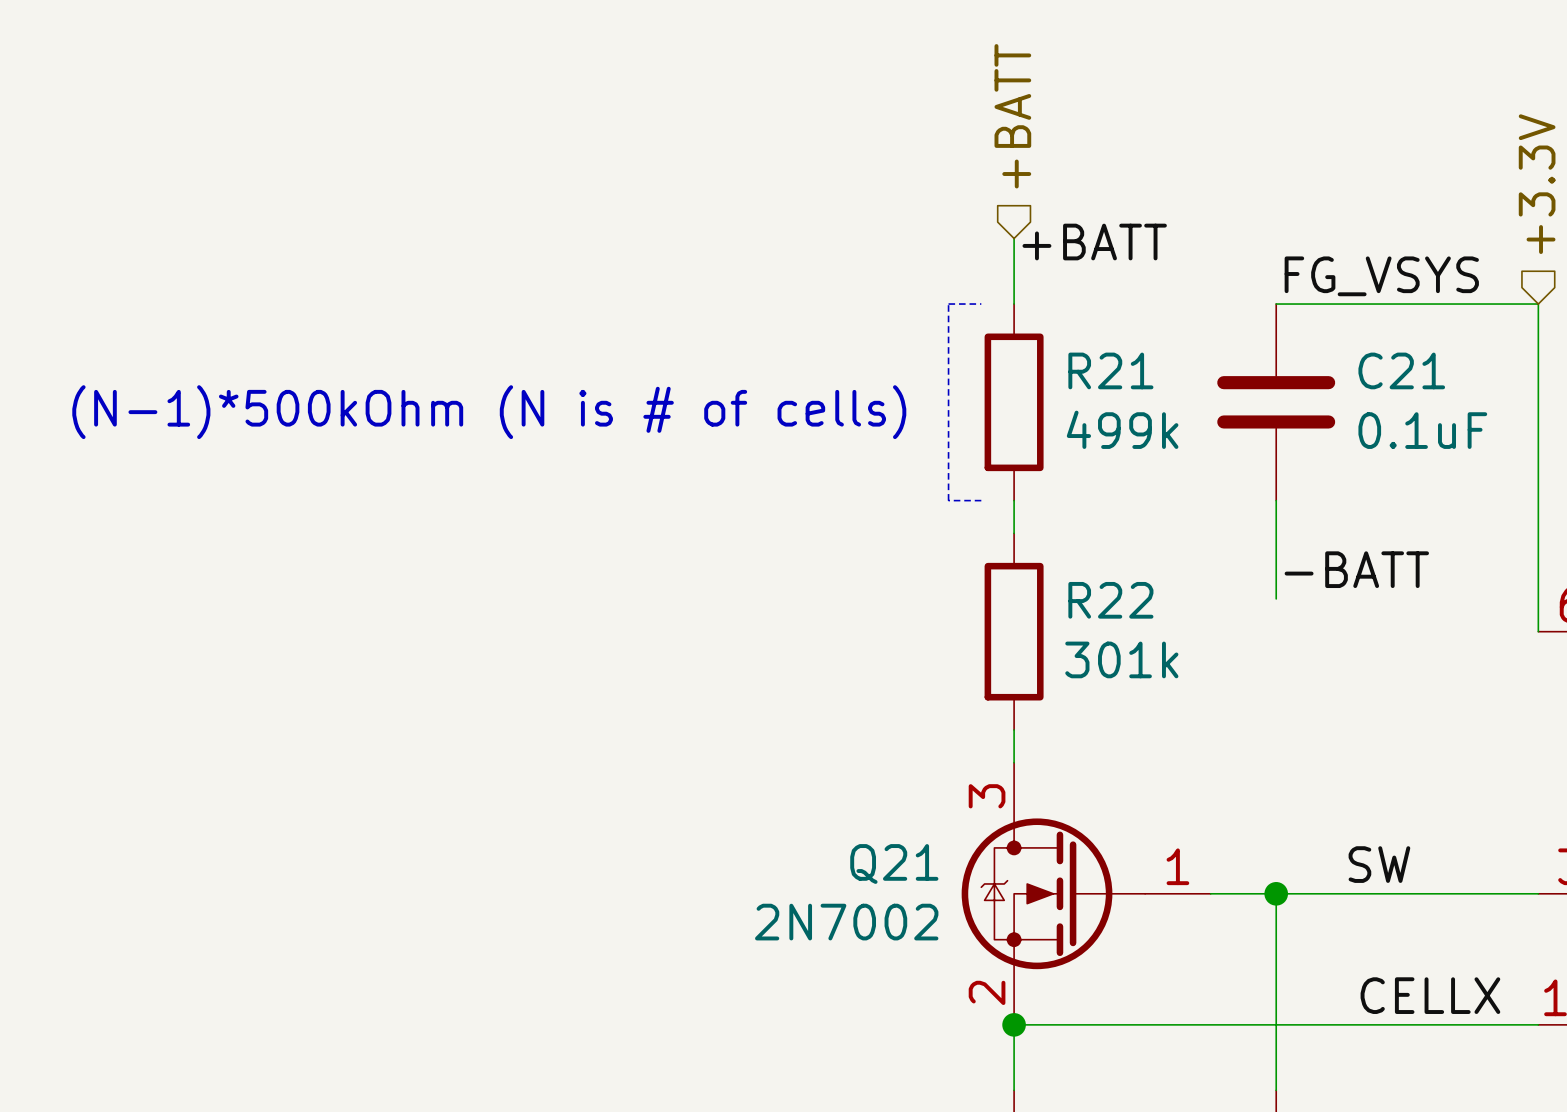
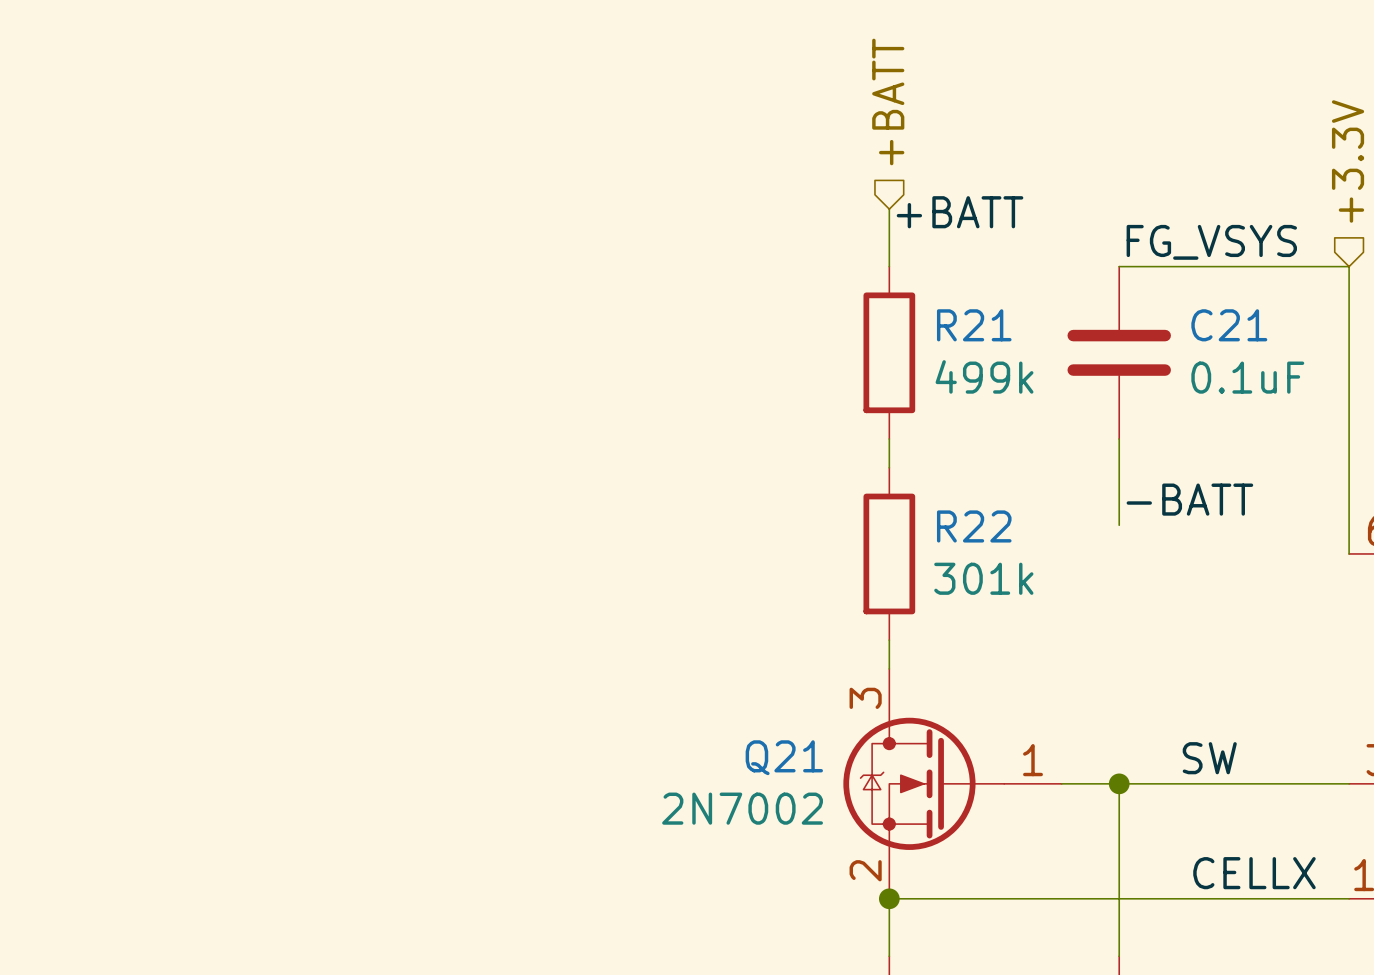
line: (981, 304) (948, 304) (948, 500) (981, 500) -> none
text: (N-1)*500kOhm (N is # of cells) (489, 412) -> none

